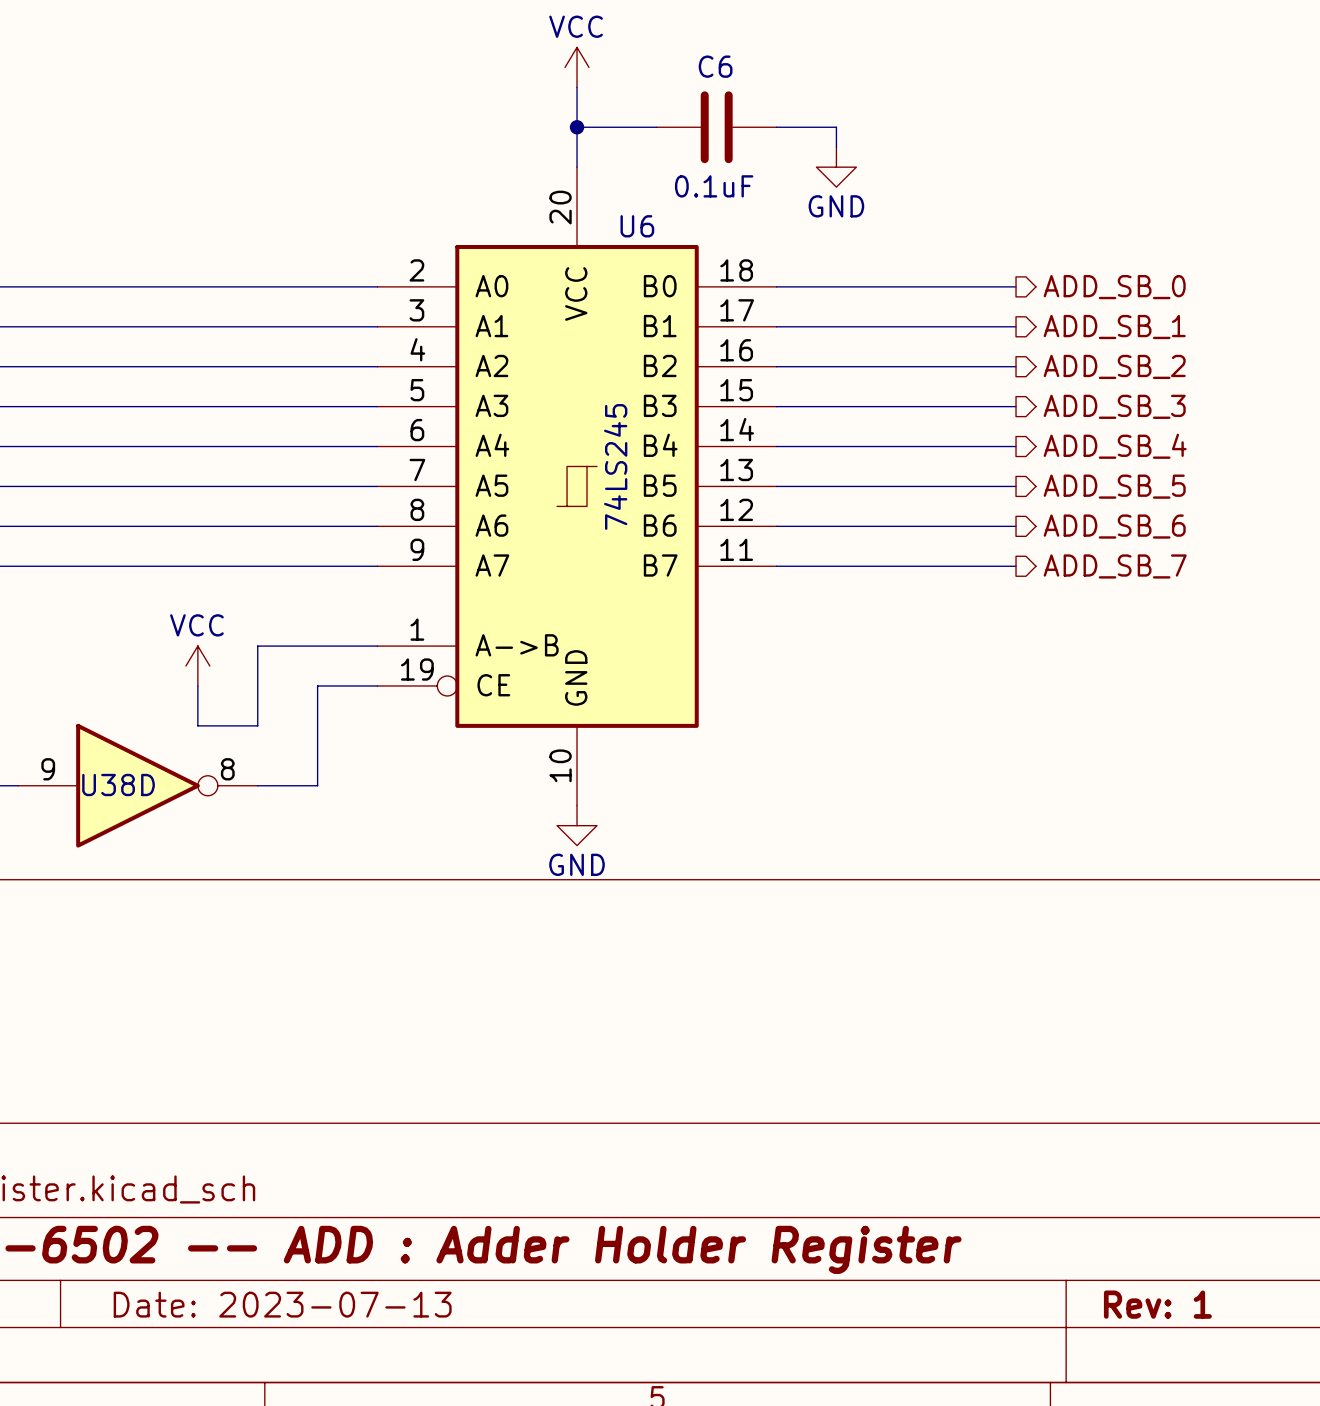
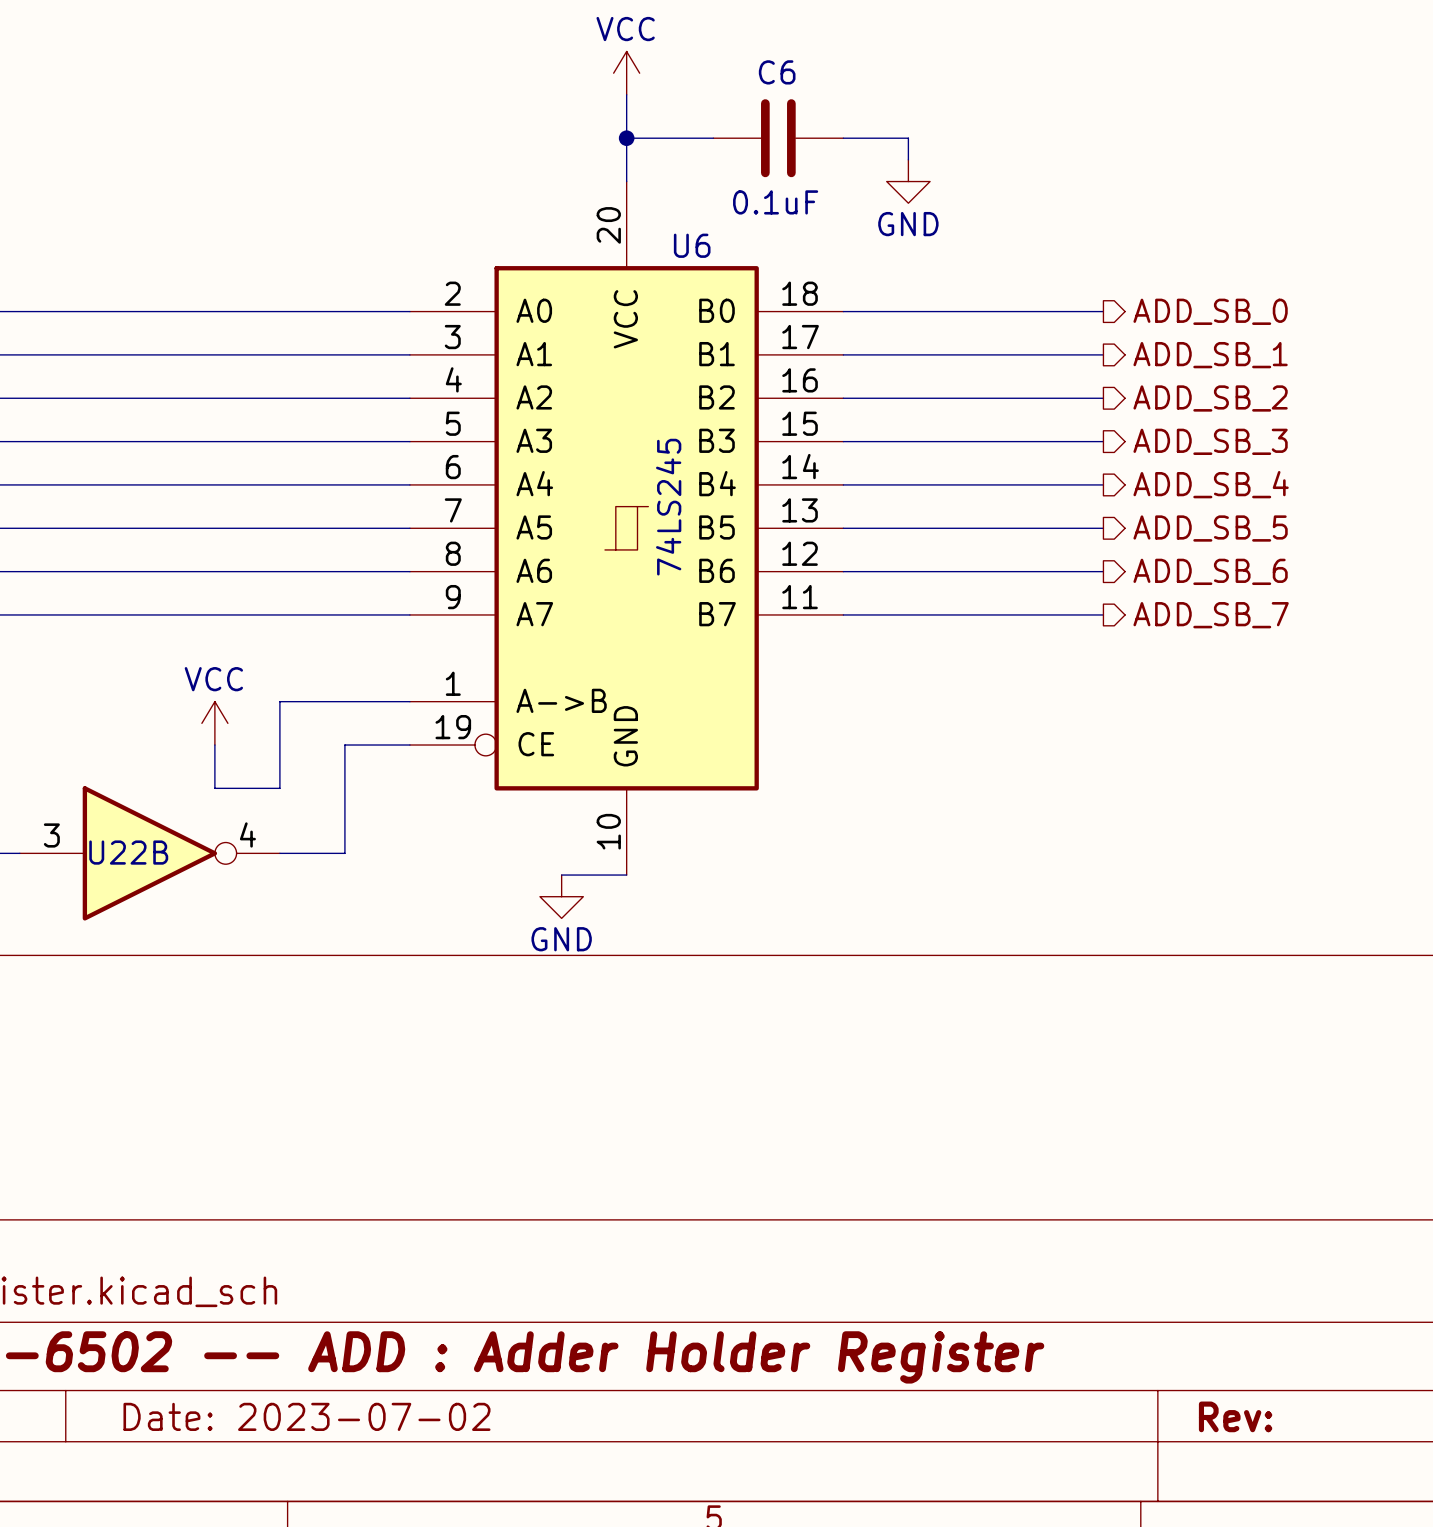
U38D pin number: 9 (48, 769) -> 3 (51, 835)
U38D pin number: 8 (227, 769) -> 4 (247, 834)
U38D name: U38D (118, 785) -> U22B (128, 852)
wire: none -> (561, 875) (626, 875)
power symbol position: GND (577, 825) -> GND (561, 896)
title block: Date: 2023-07-13 (282, 1304) -> Date: 2023-07-02 (306, 1416)
title block: Rev: 1 (1157, 1304) -> Rev: (1235, 1416)

